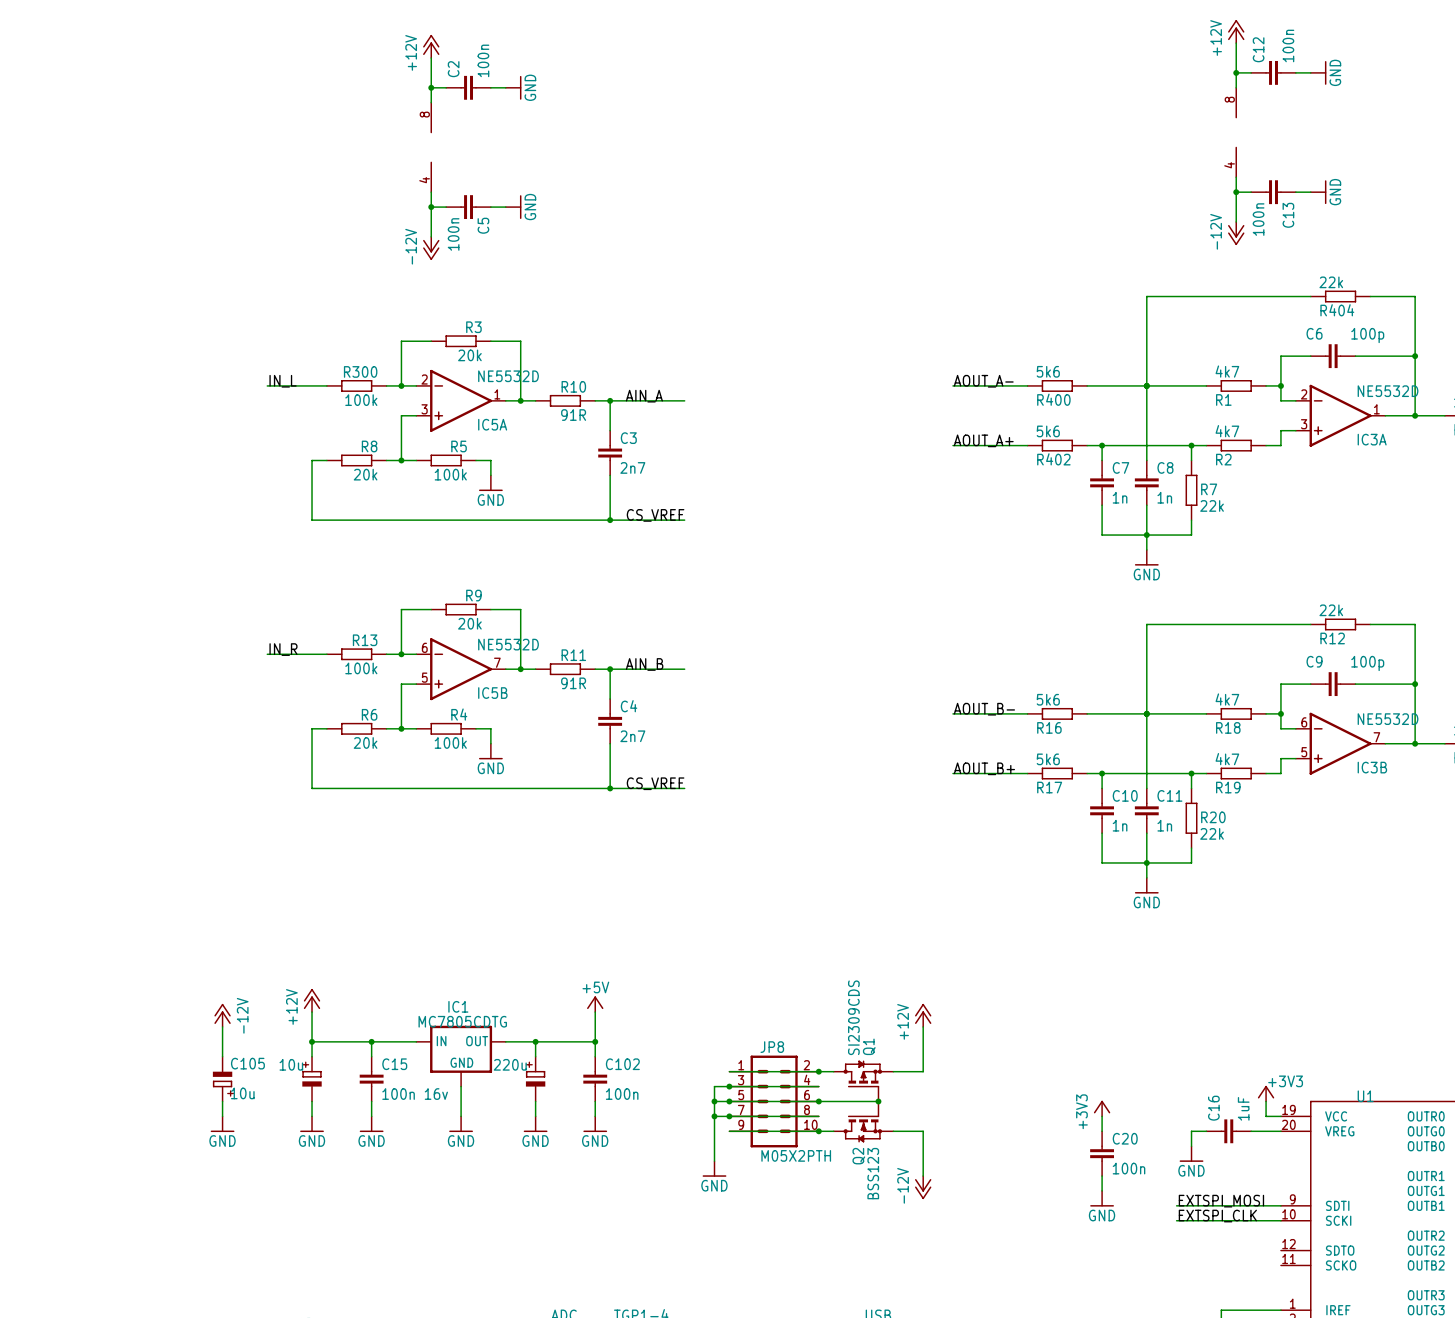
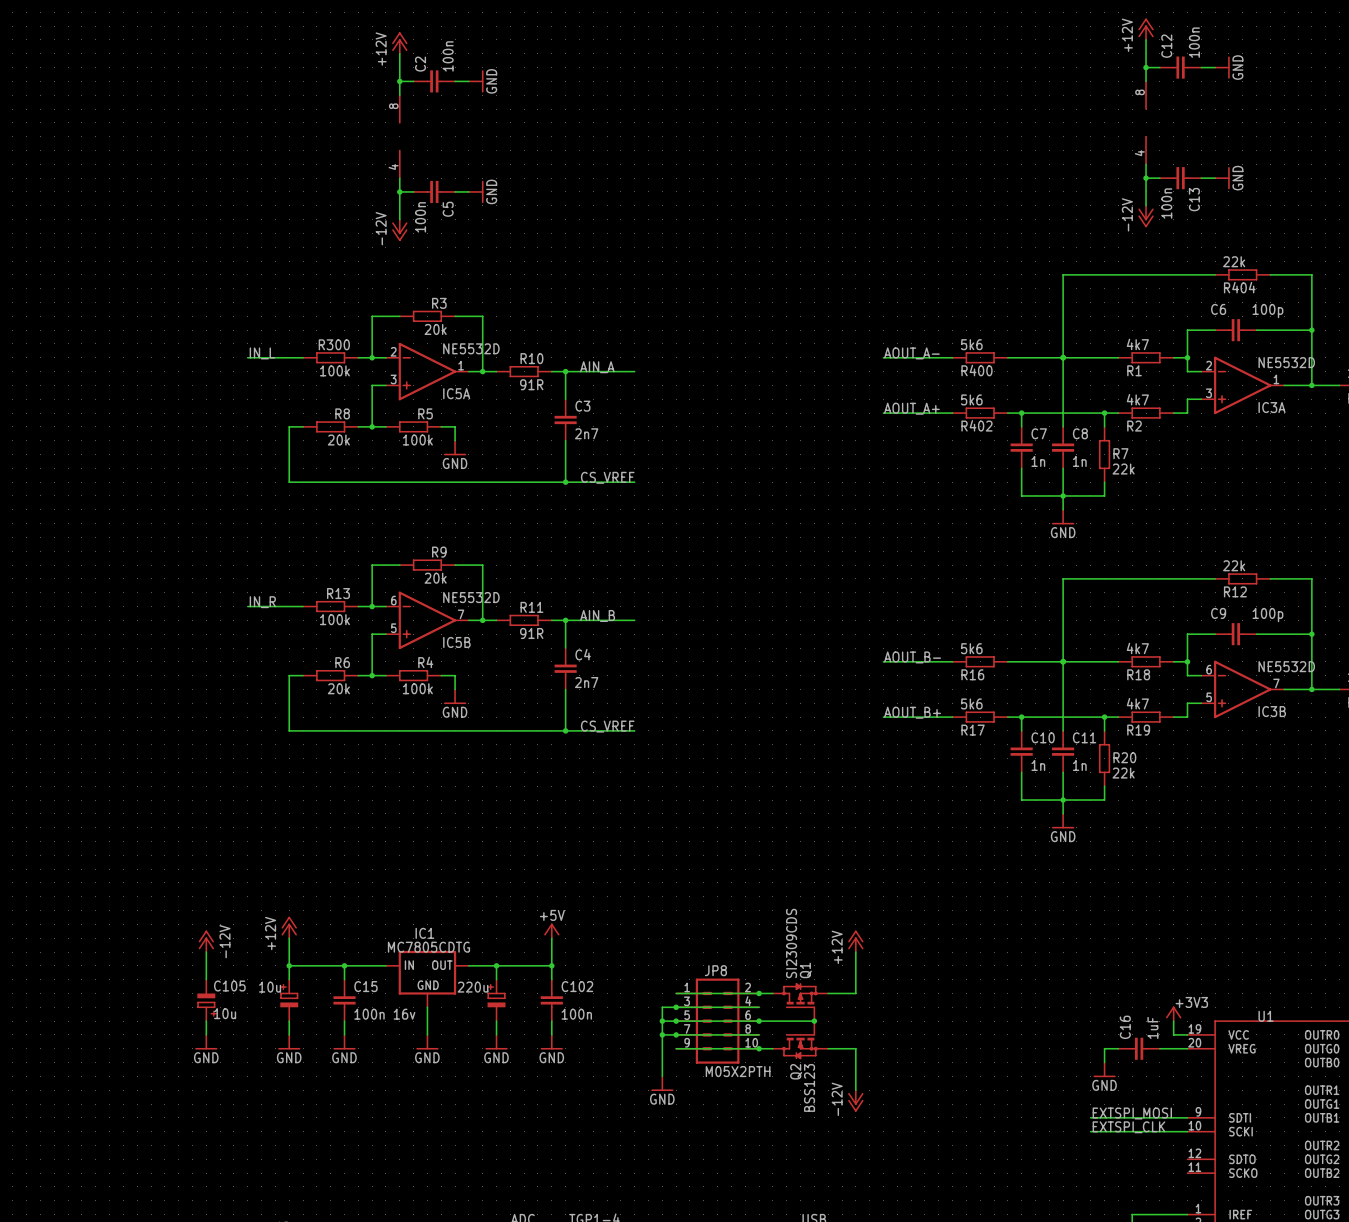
power symbol: +3V3 (1102, 1108) -> none
wire: (1102, 1116) (1102, 1131) -> none
C20: 100n (1102, 1153) -> none
wire: (1102, 1176) (1102, 1190) -> none
power symbol: GND (1102, 1198) -> none

